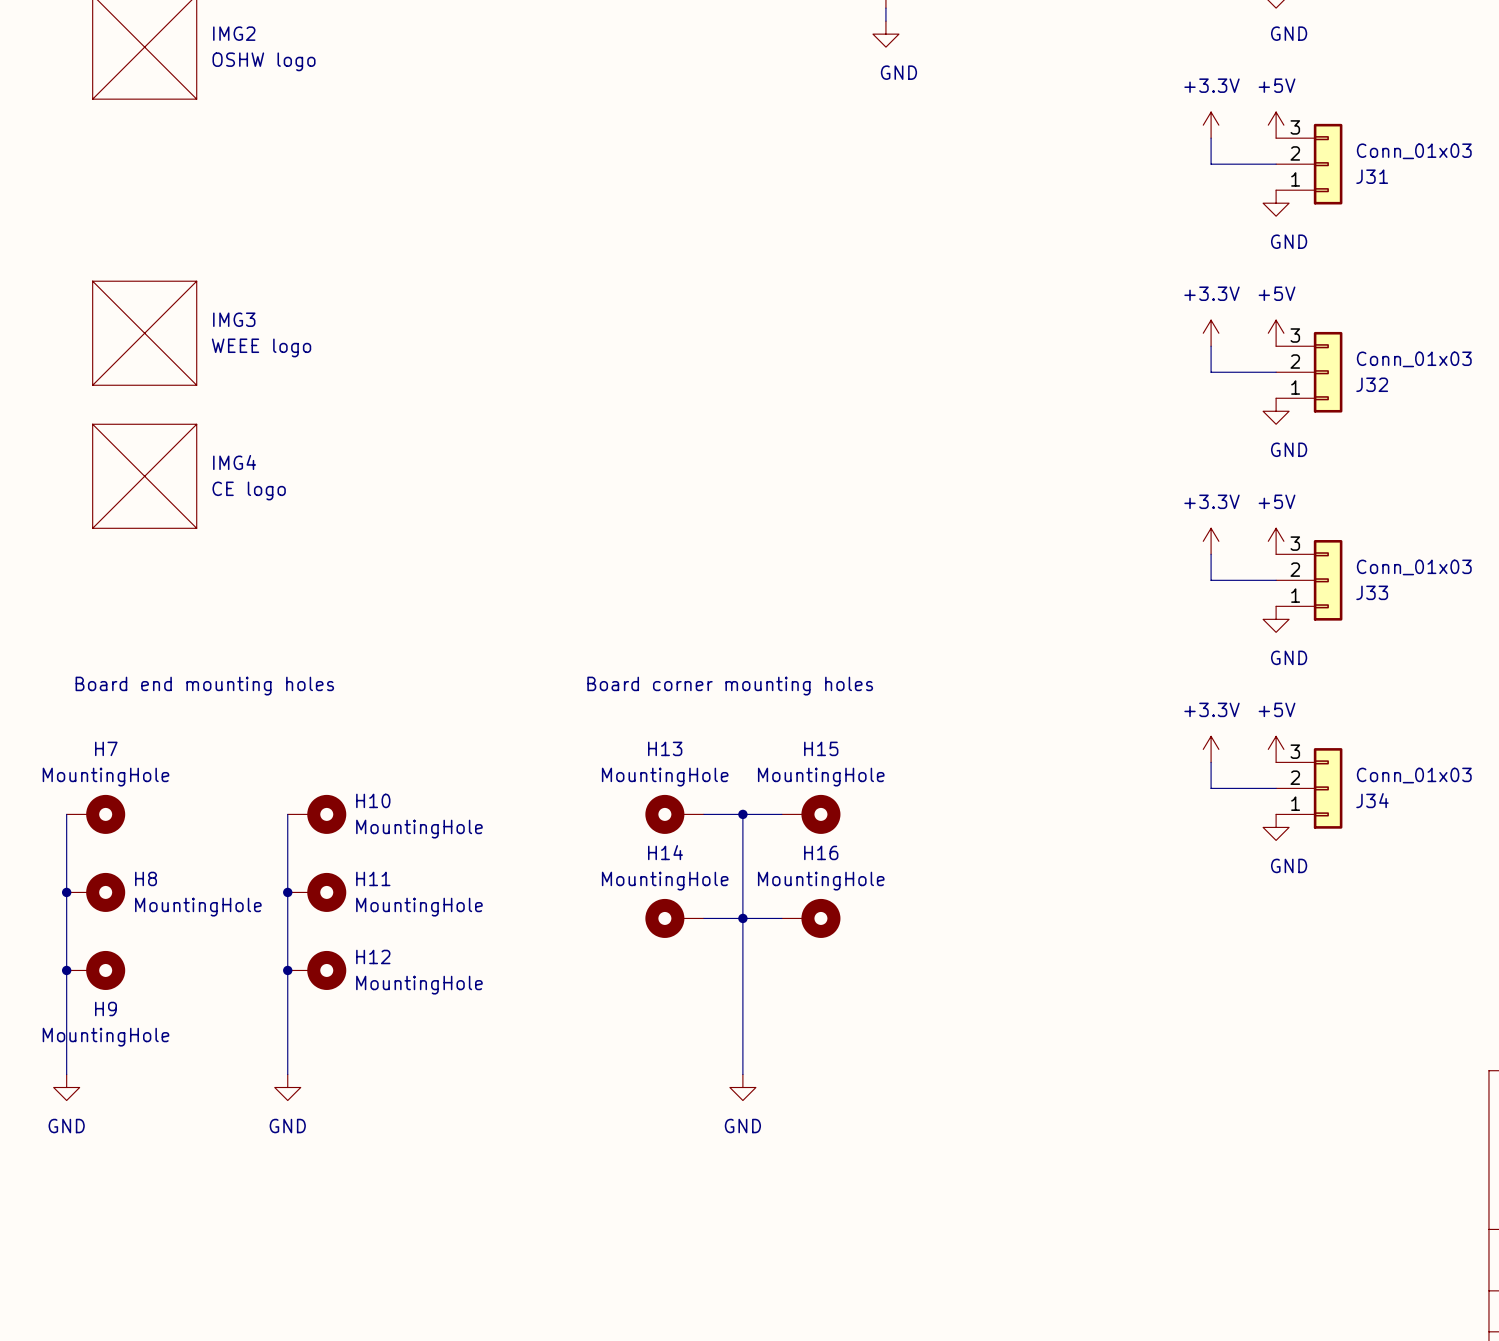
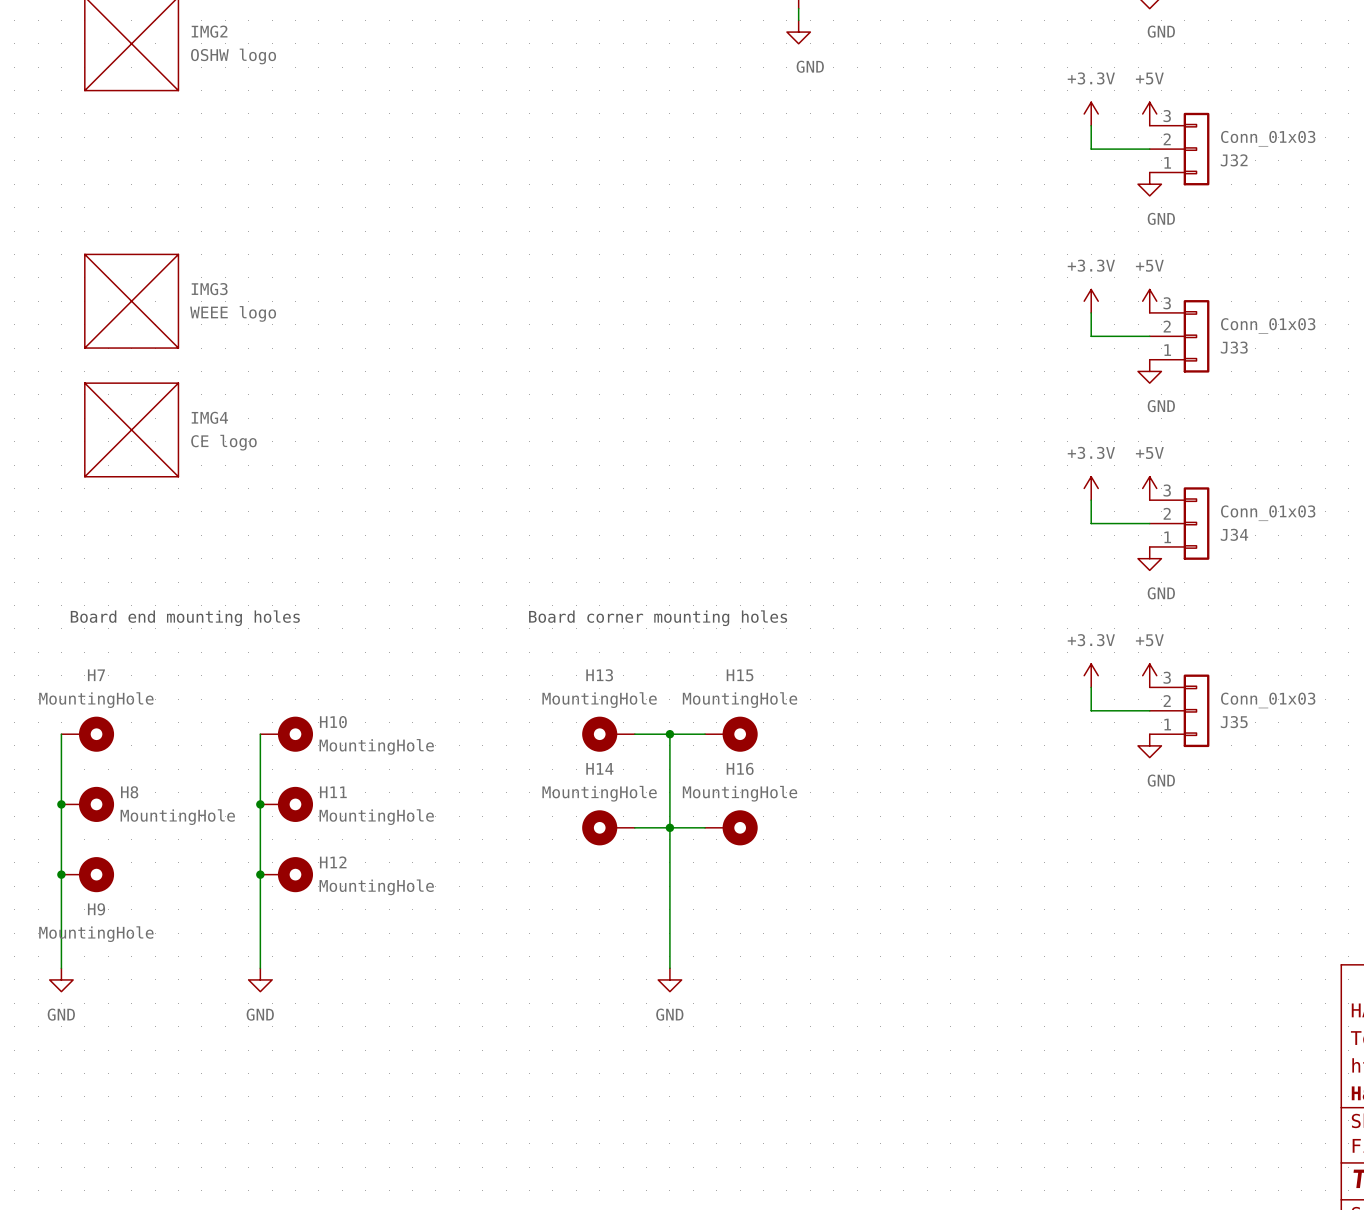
J31 name: J31 (1372, 176) -> J32 (1234, 160)
J32 name: J32 (1372, 384) -> J33 (1234, 347)
J33 name: J33 (1372, 592) -> J34 (1234, 534)
J34 name: J34 (1372, 800) -> J35 (1234, 722)

